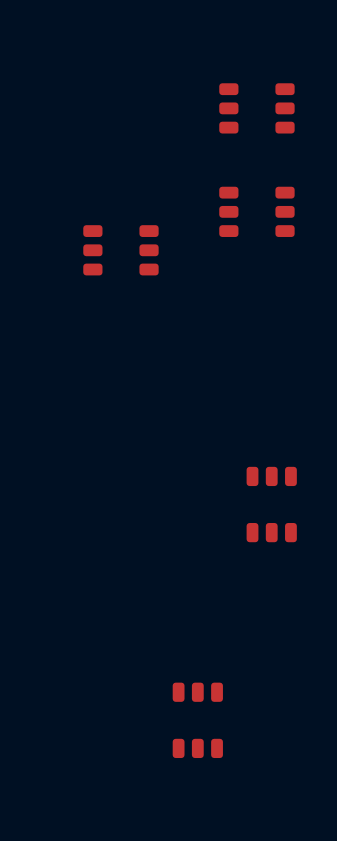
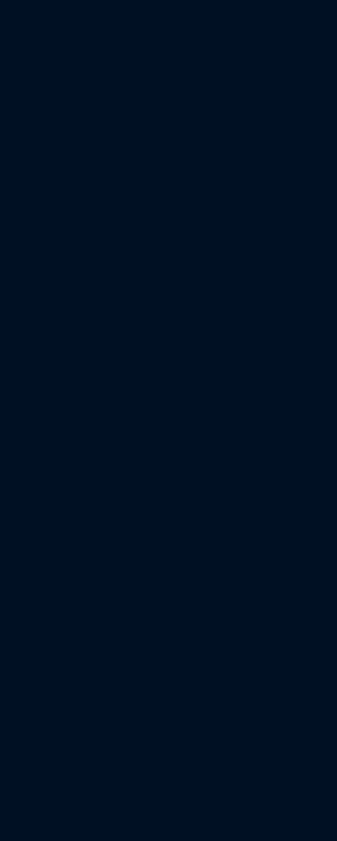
part: (256, 108) -> none
part: (256, 211) -> none
part: (120, 250) -> none
part: (271, 504) -> none
part: (197, 720) -> none

